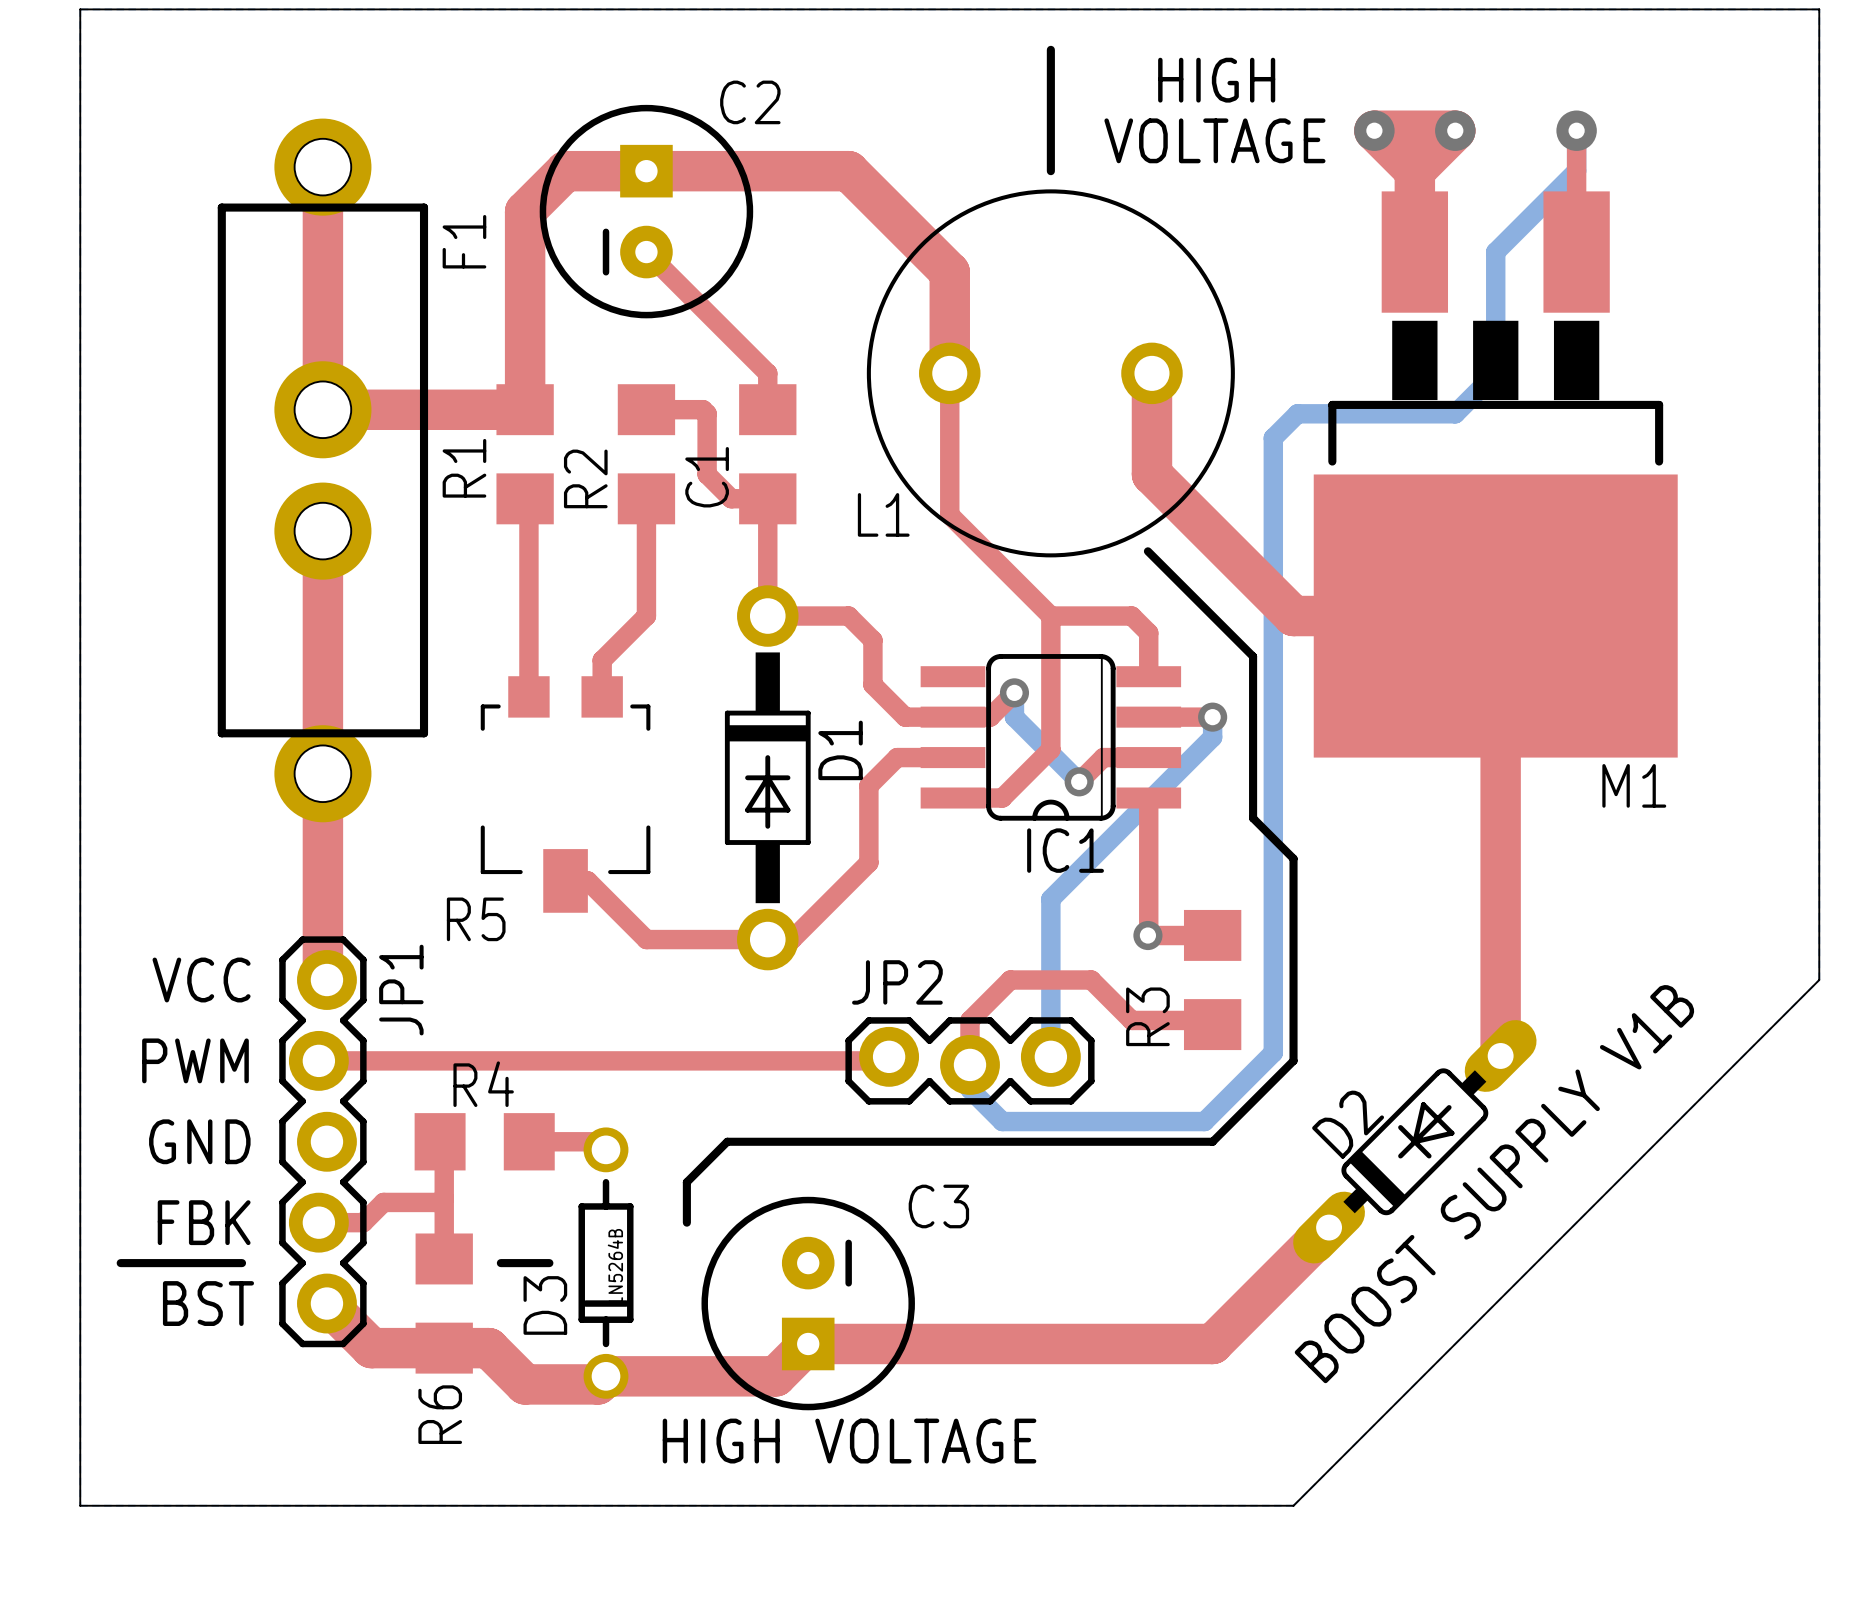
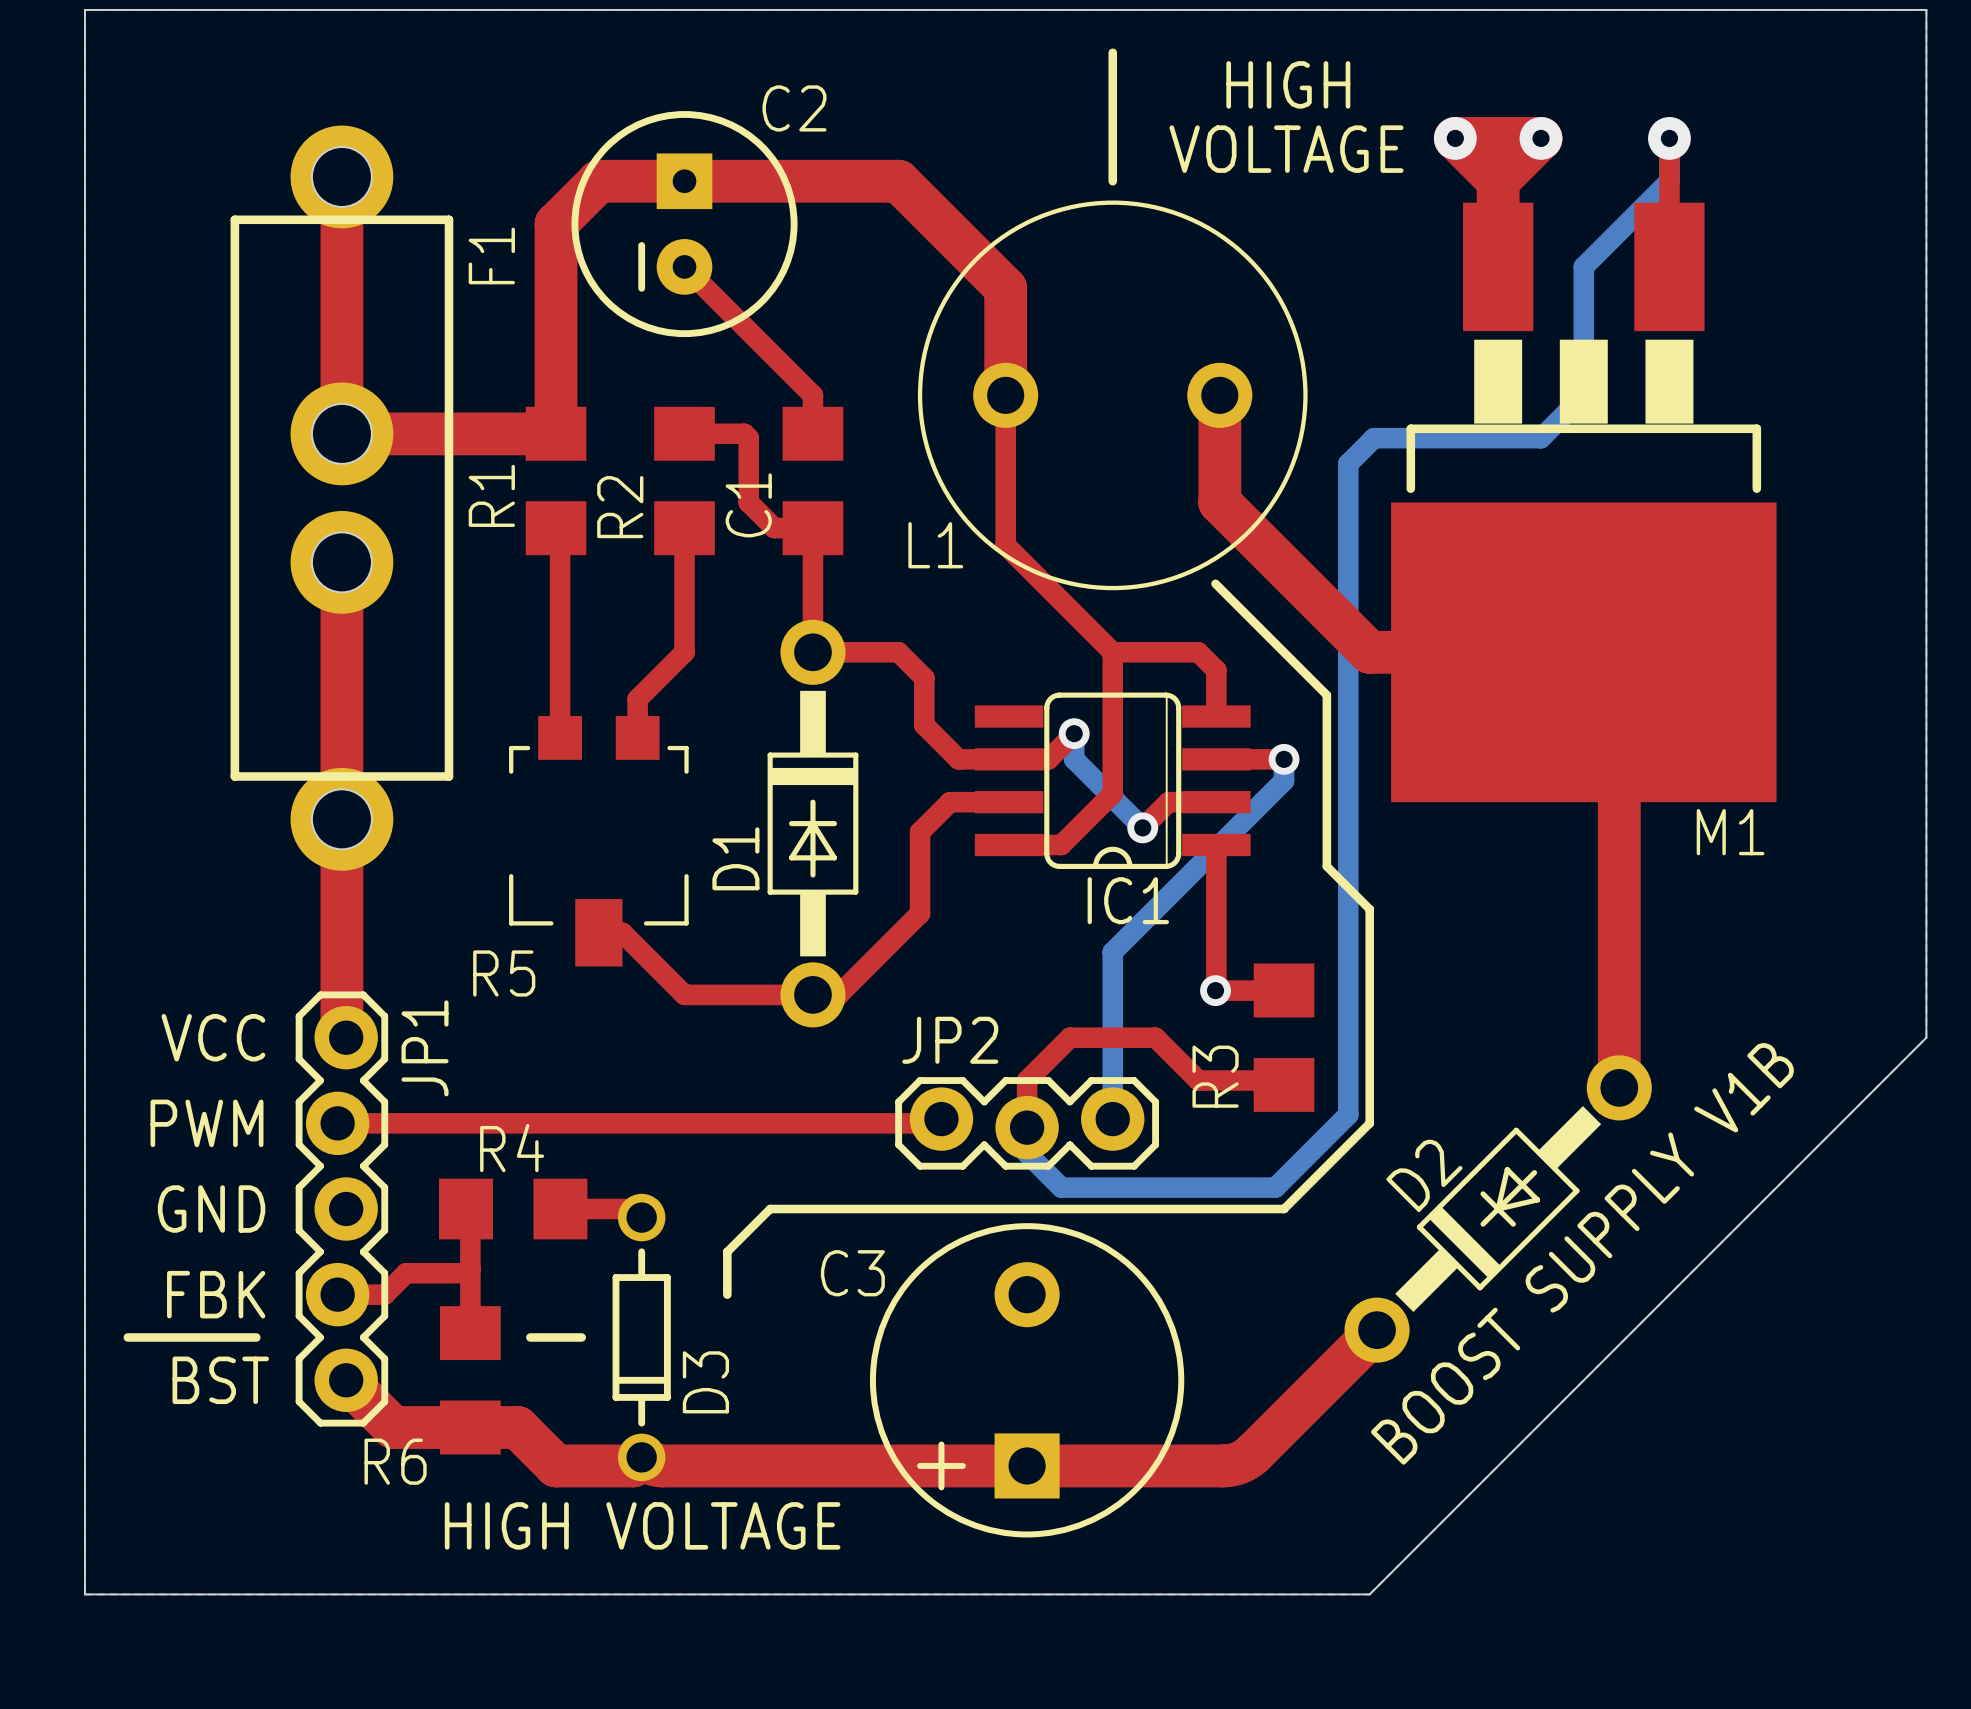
top track: (1500, 620) (1500, 1055) -> (1589, 657) (1610, 679) (1618, 699) (1619, 1087)
D1 name position: D1 (840, 750) -> D1 (735, 858)
D2 footprint: [1293, 1020, 1537, 1264] -> [1344, 1055, 1652, 1363]
C3 footprint: [701, 1196, 915, 1411] -> [869, 1223, 1185, 1538]
C3 name position: C3 (938, 1206) -> C3 (852, 1273)
D3 value: 1N5264B (615, 1267) -> none
D3 name position: D3 (545, 1305) -> D3 (705, 1382)
top track: (1212, 1343) (808, 1343) (775, 1376) (606, 1376) -> (1284, 1423) (1249, 1457) (1239, 1462) (1223, 1465) (662, 1465) (651, 1463) (641, 1457)
R6 name rotation: 0° (440, 1414) -> 90° clockwise (395, 1461)
text position: HIGH VOLTAGE (849, 1441) -> HIGH VOLTAGE (642, 1525)

